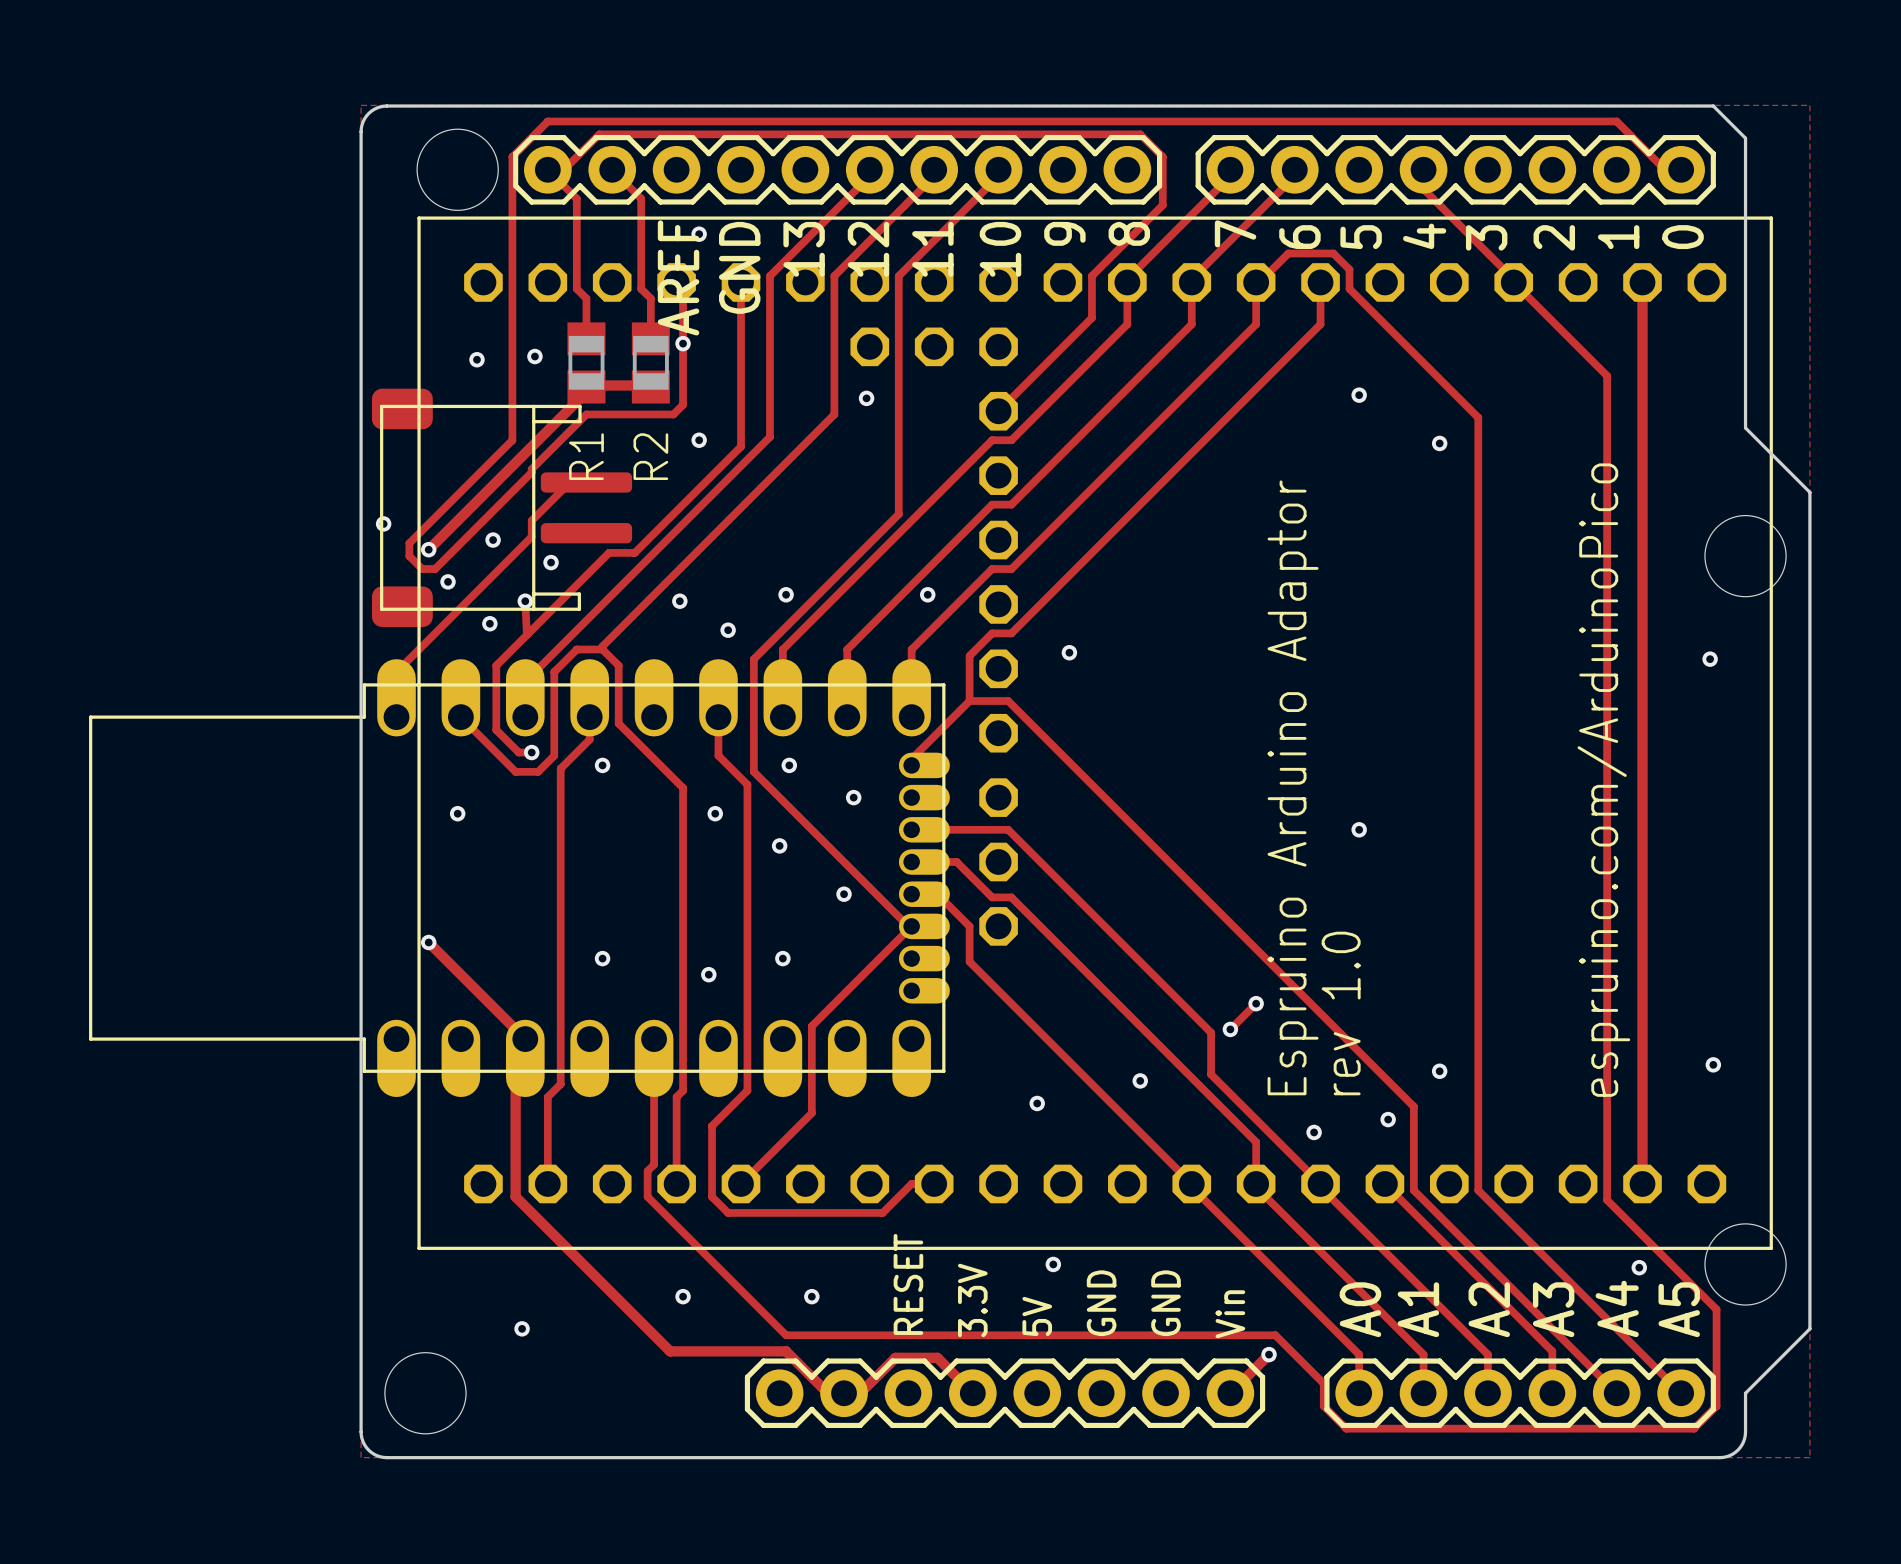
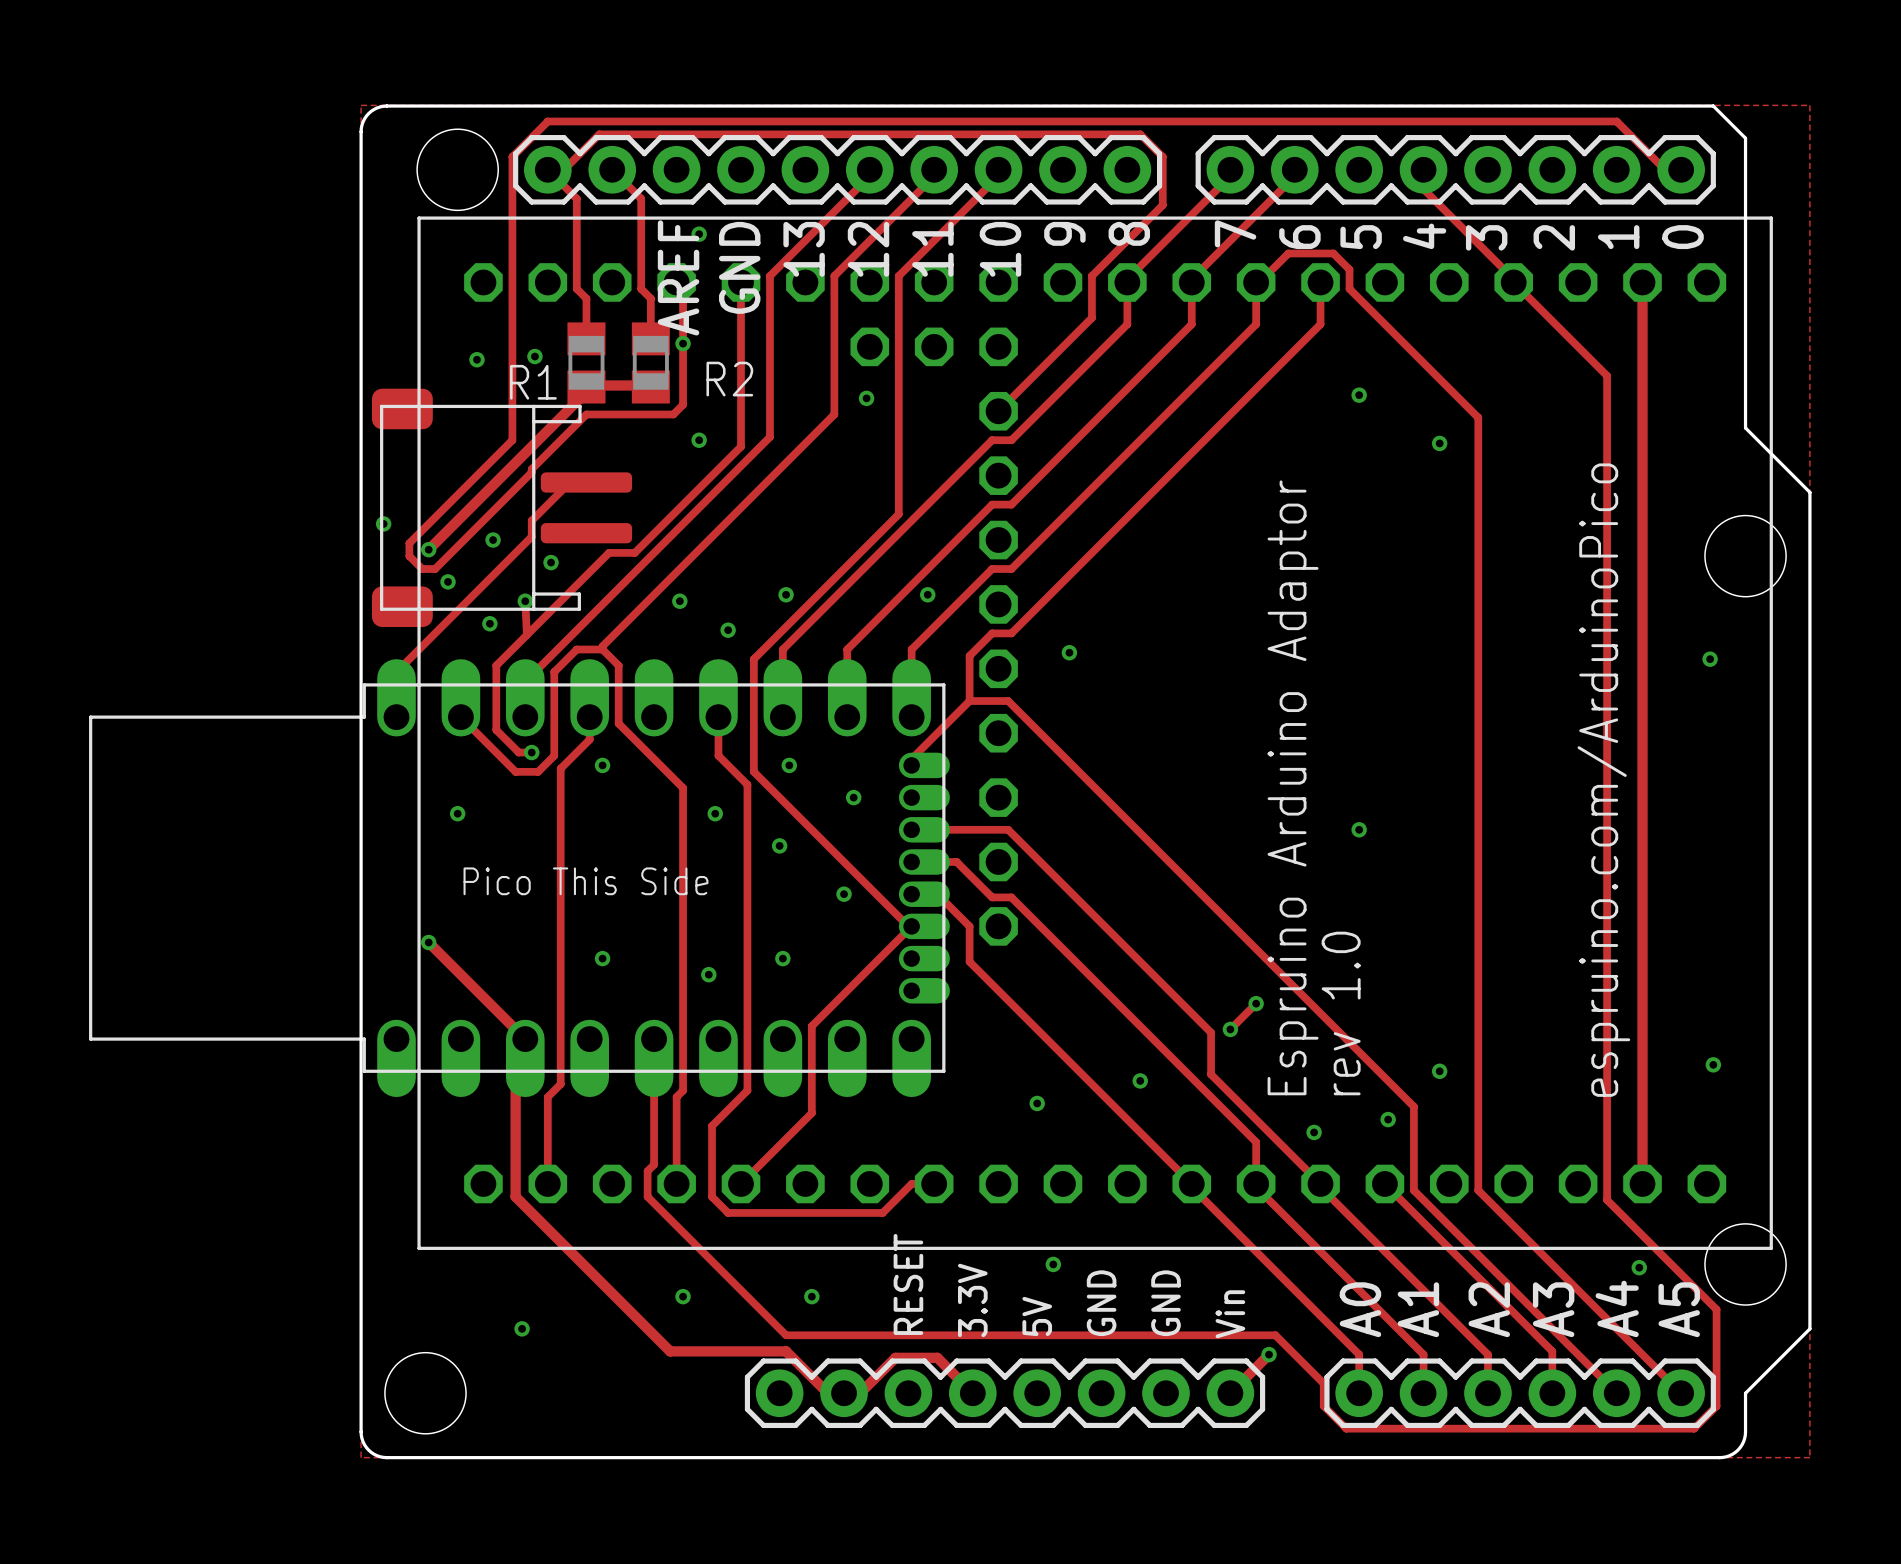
R1 name rotation: 0° (586, 456) -> 90° clockwise (533, 382)
R1 name position: R1 (586, 456) -> R1 (533, 382)
R2 name rotation: 0° (650, 456) -> 90° clockwise (729, 379)
R2 name position: R2 (650, 456) -> R2 (729, 379)
text: none -> Pico This Side (585, 881)

